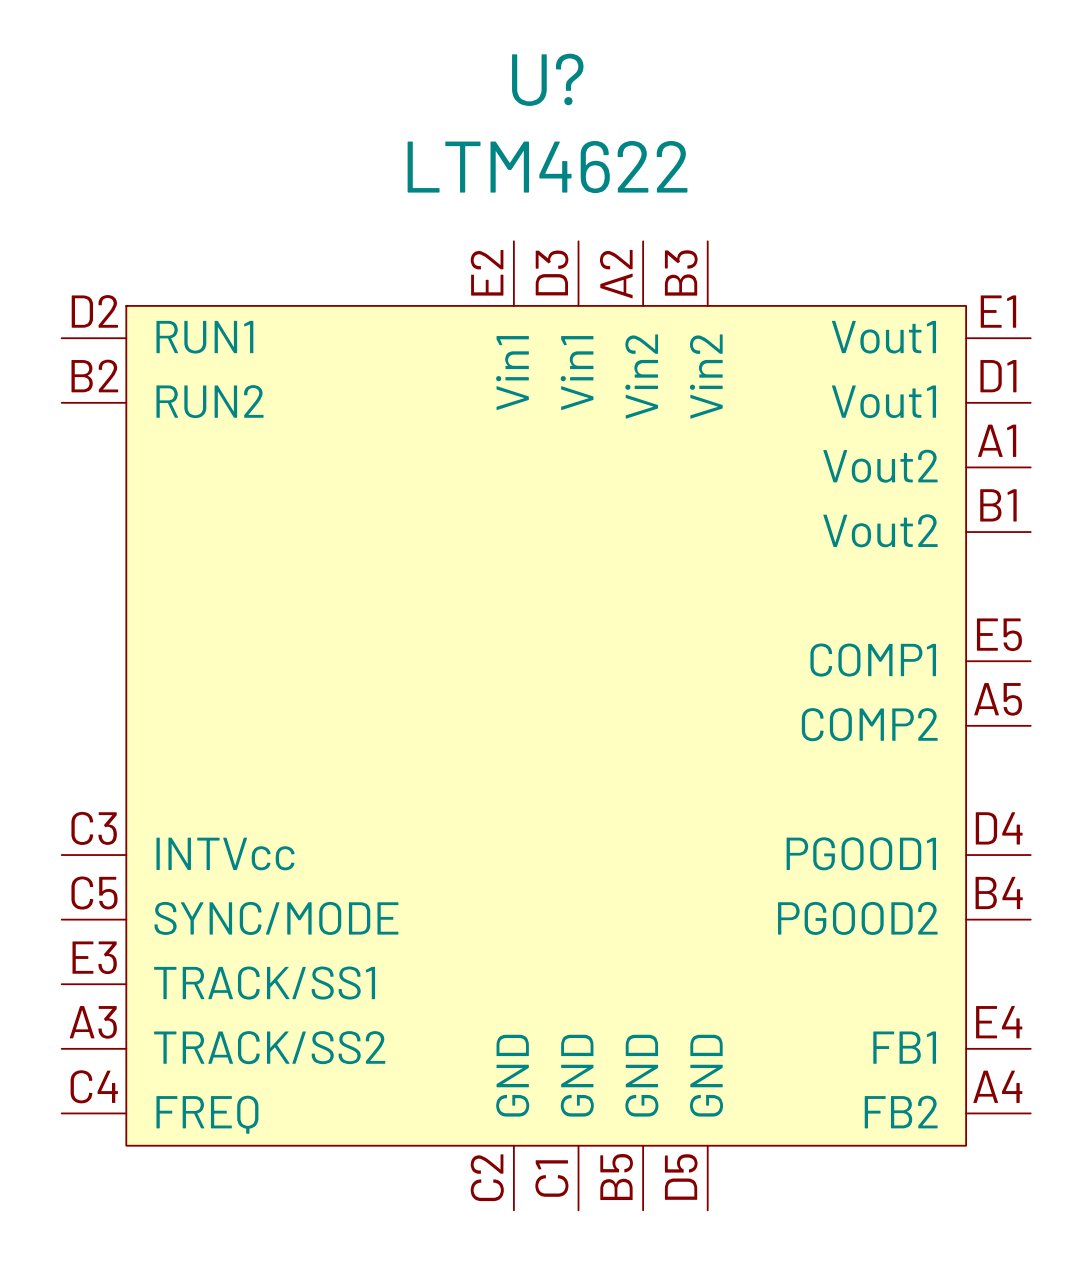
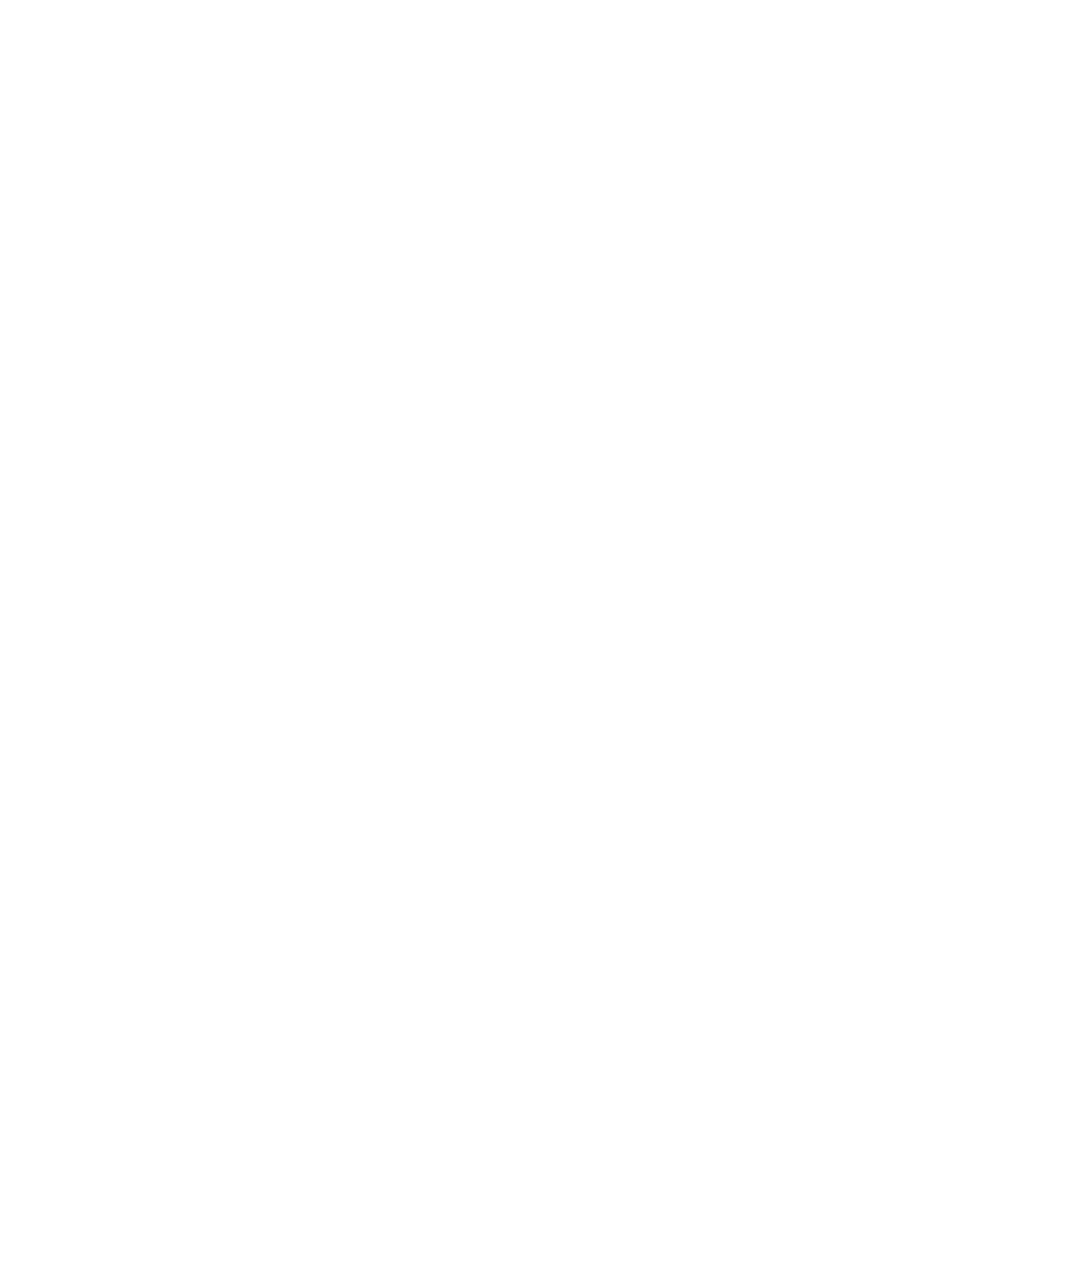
U?: LTM4622 (546, 725) -> none

